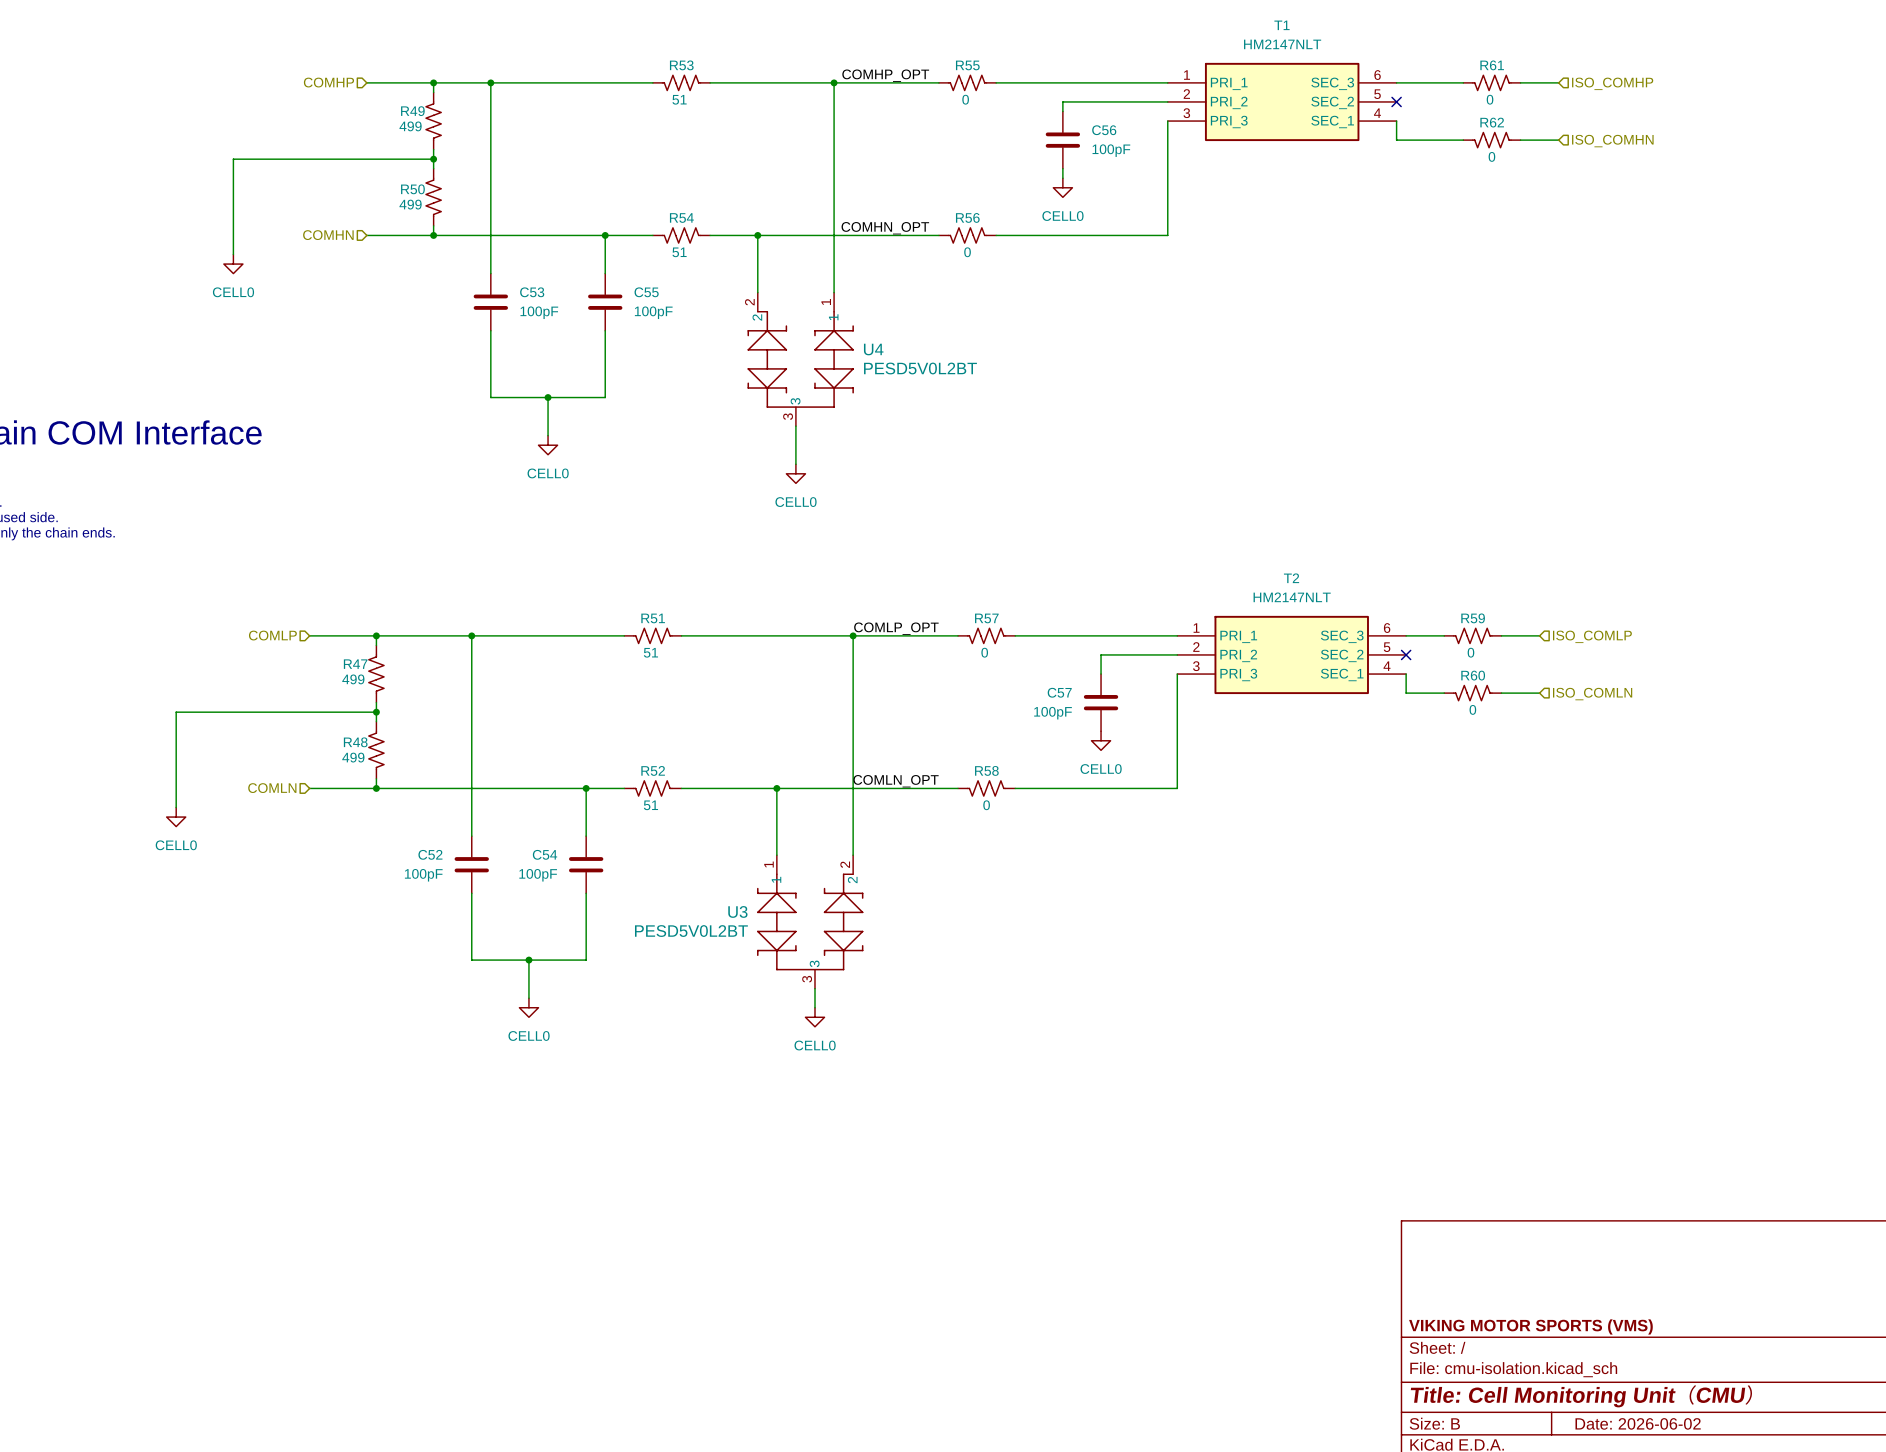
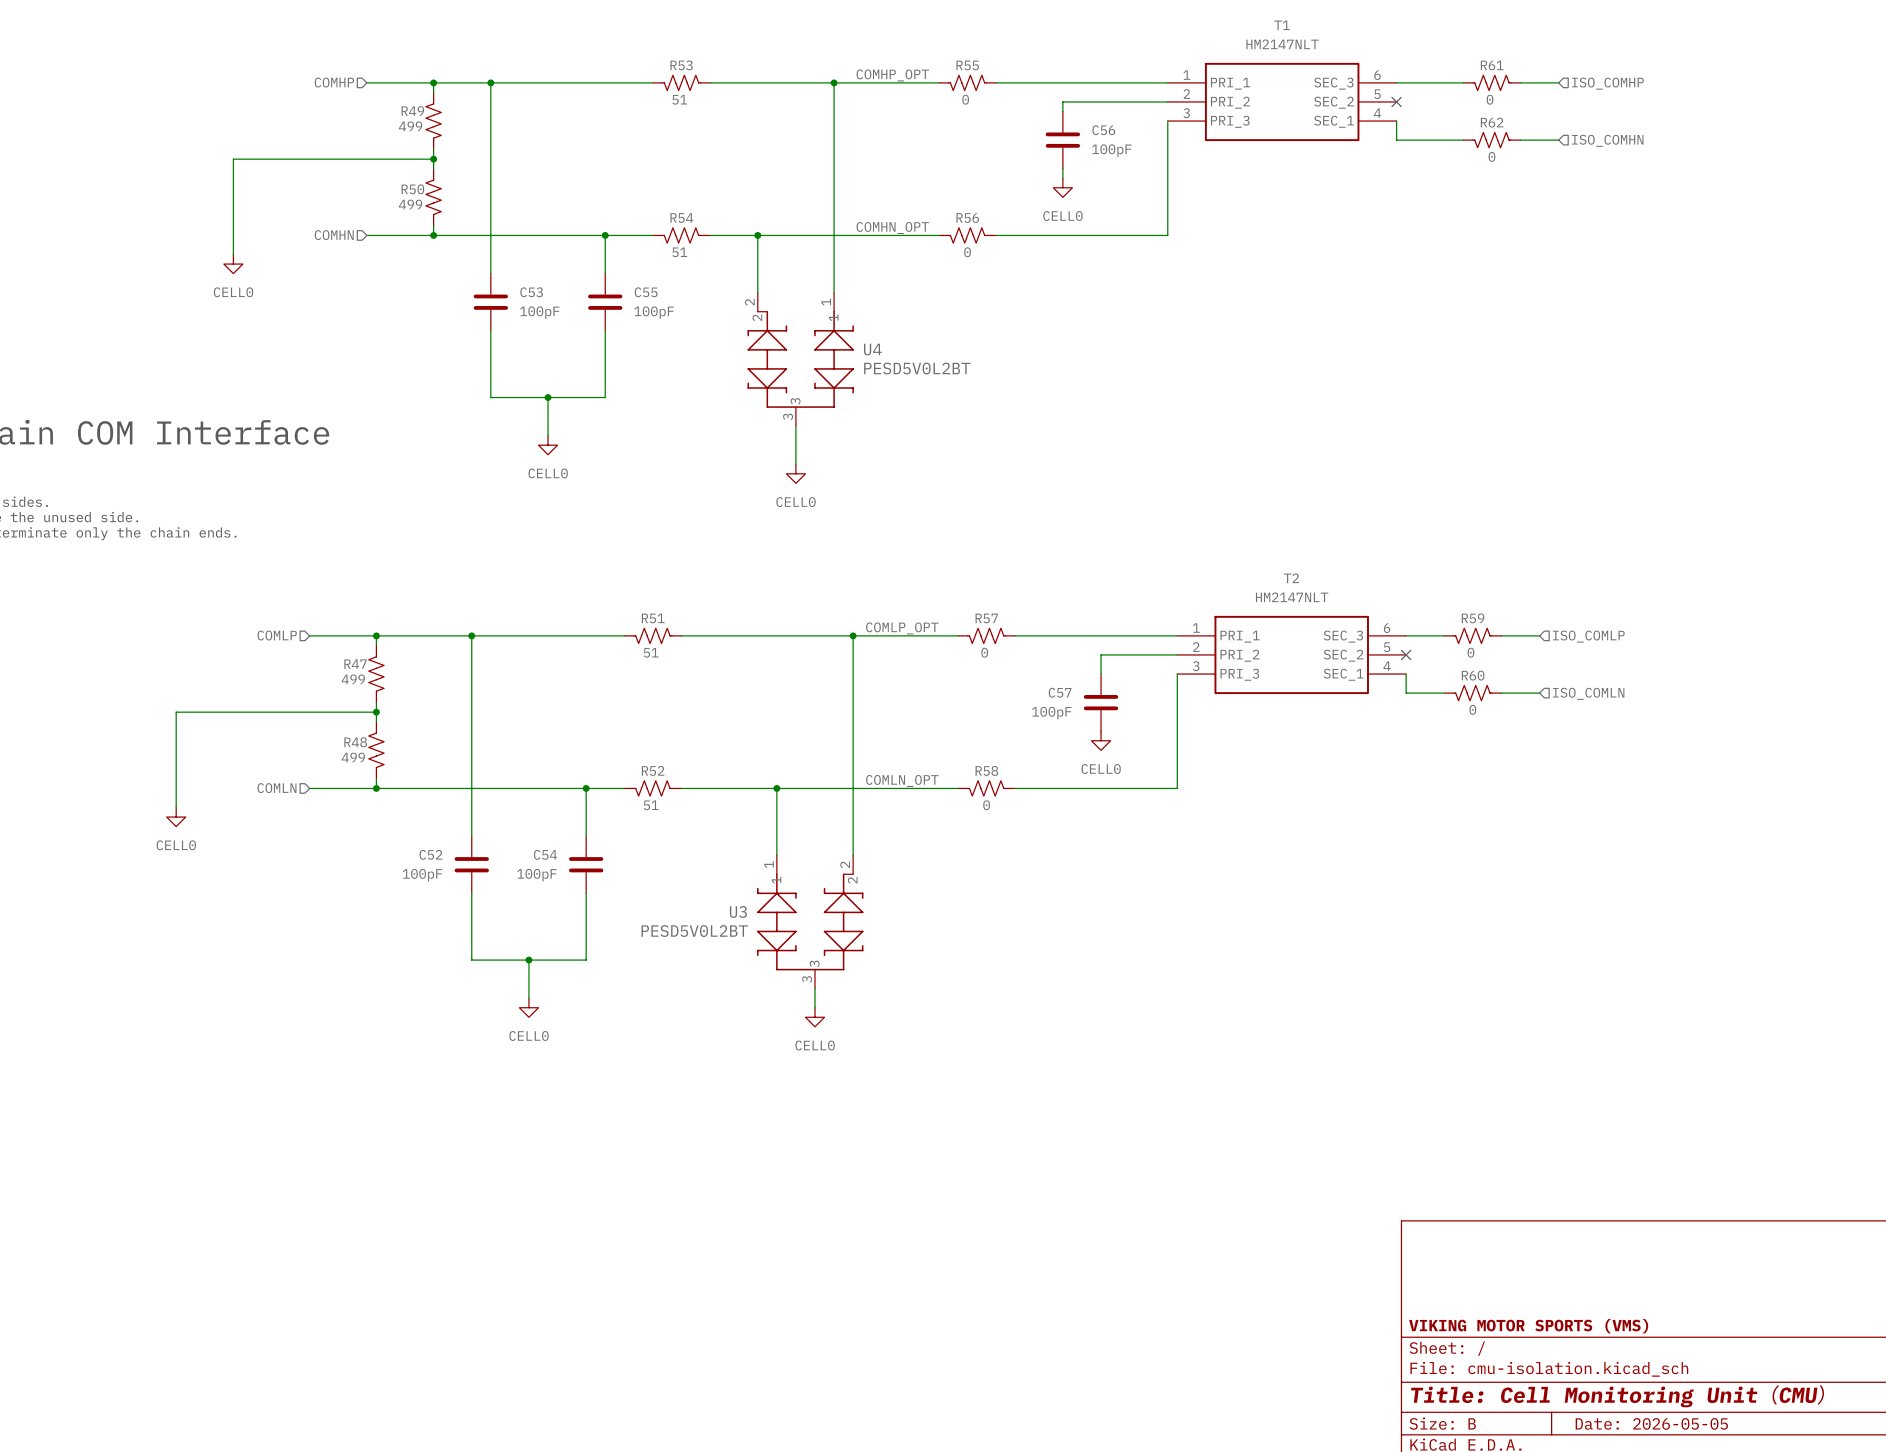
title block: Date: 2026-06-02 (1638, 1423) -> Date: 2026-05-05 (1651, 1423)

